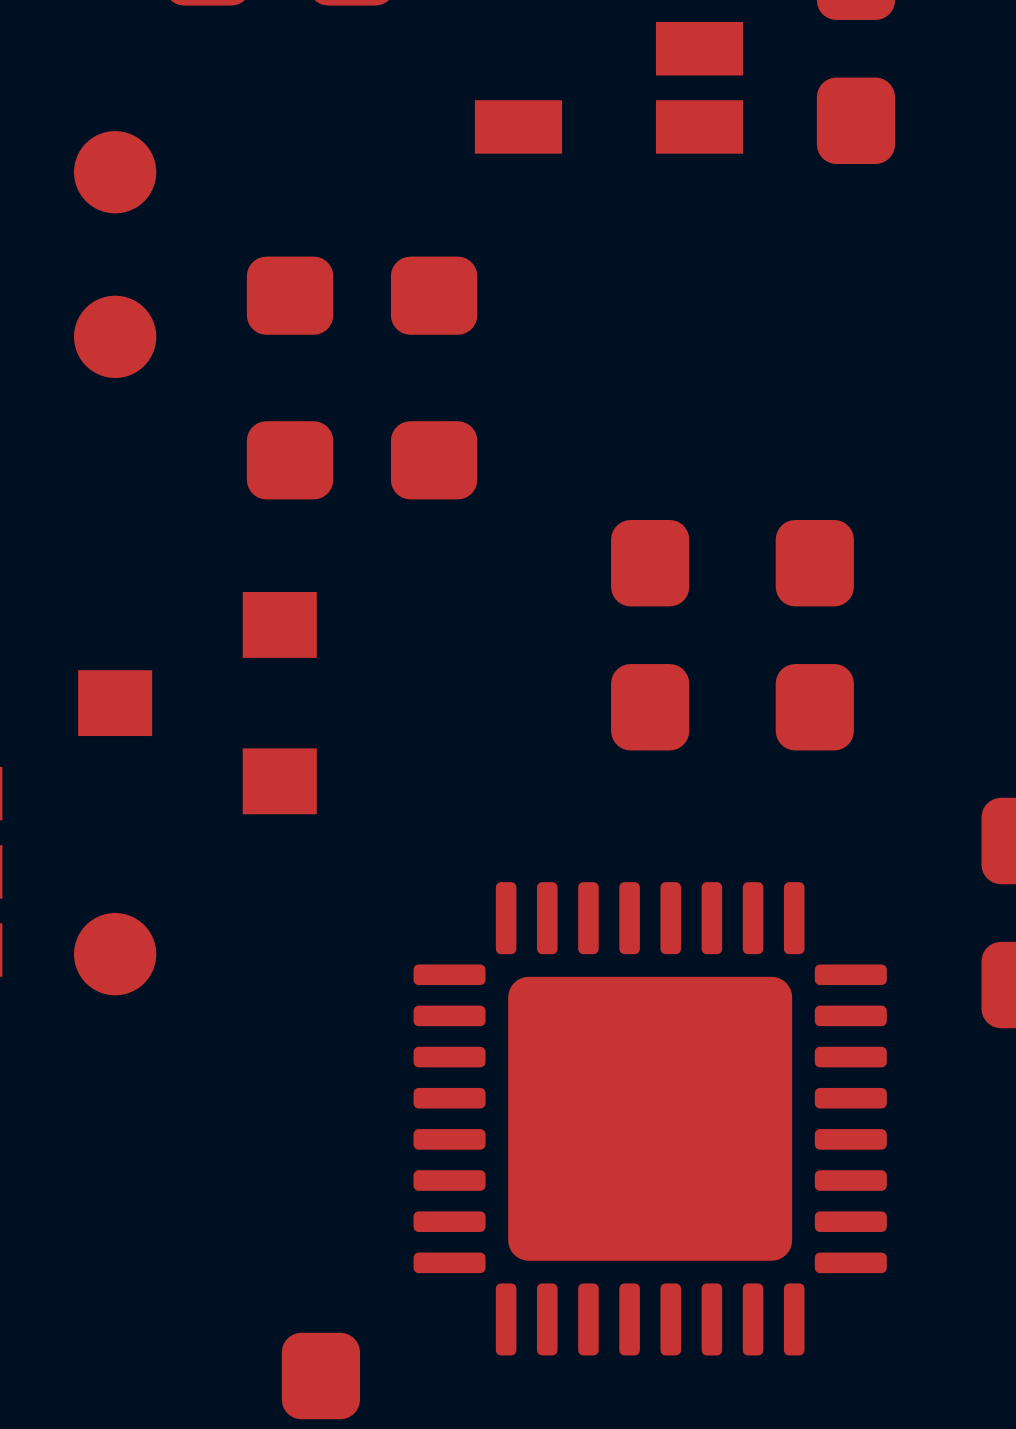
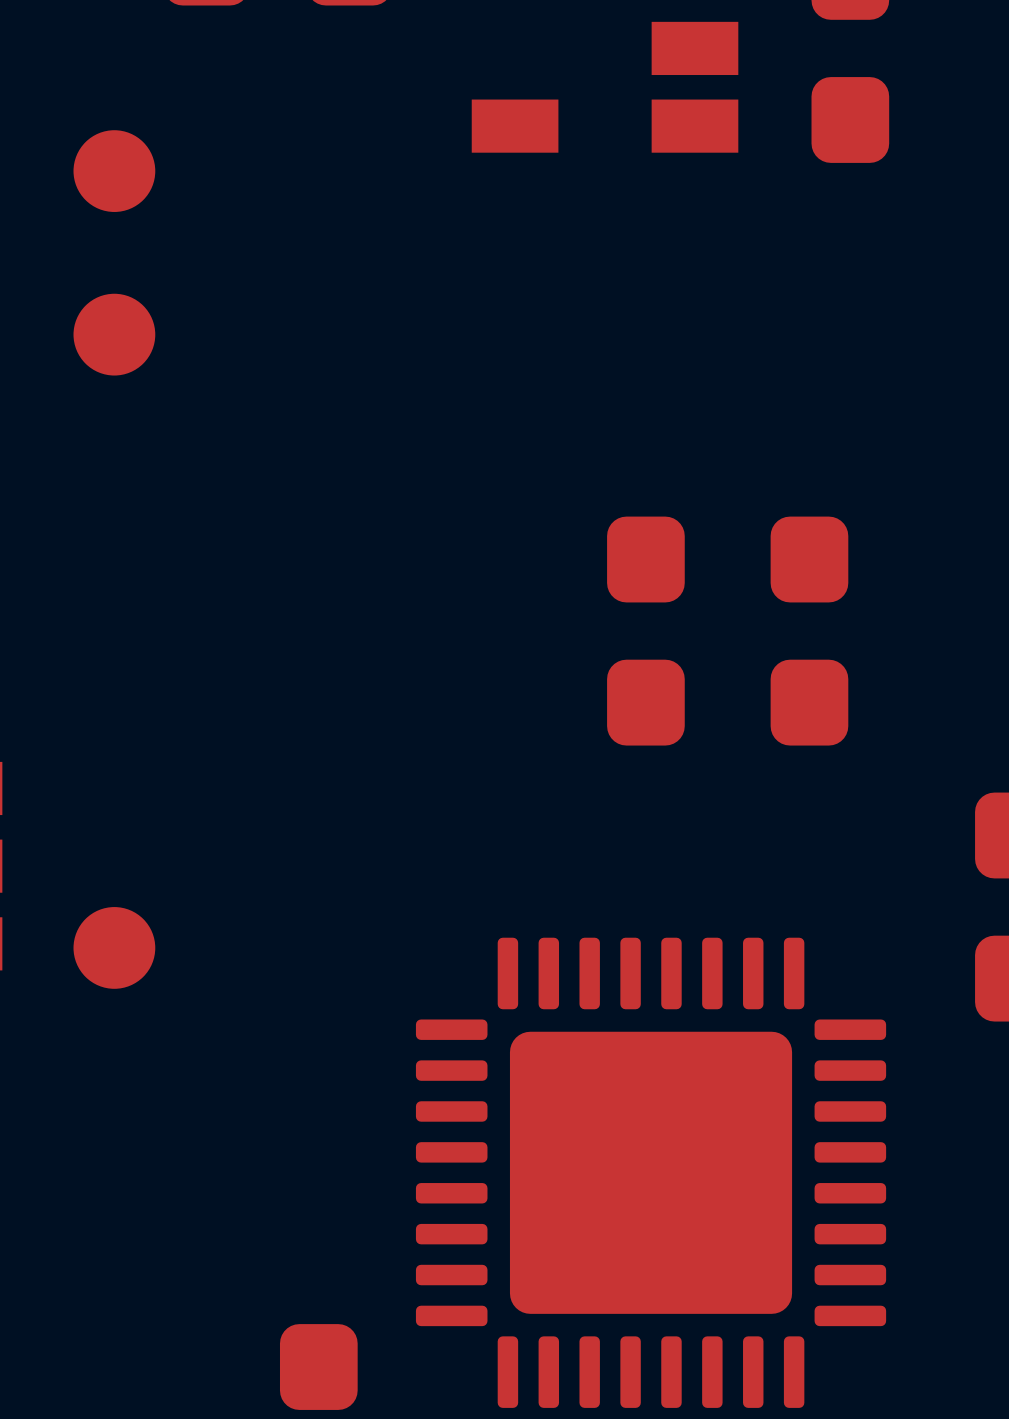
part: (362, 295) -> none
part: (362, 460) -> none
part: (197, 703) -> none
part position: (650, 1118) -> (651, 1172)

